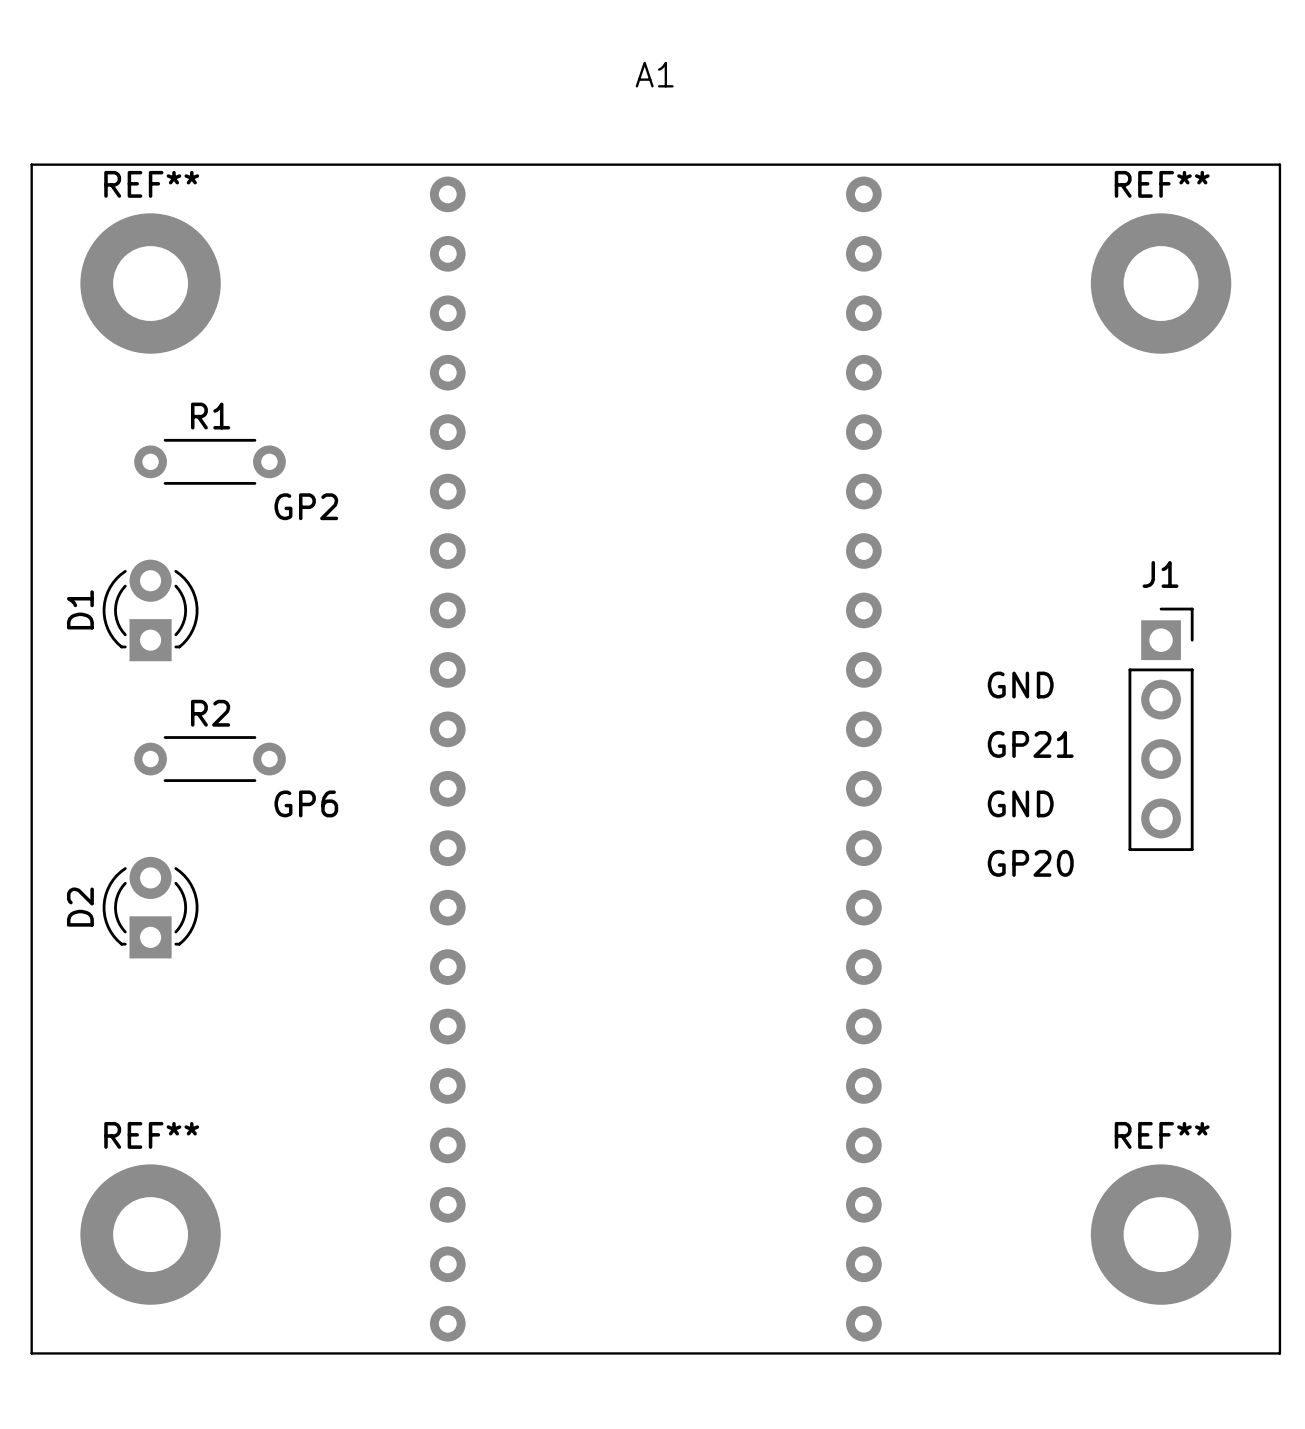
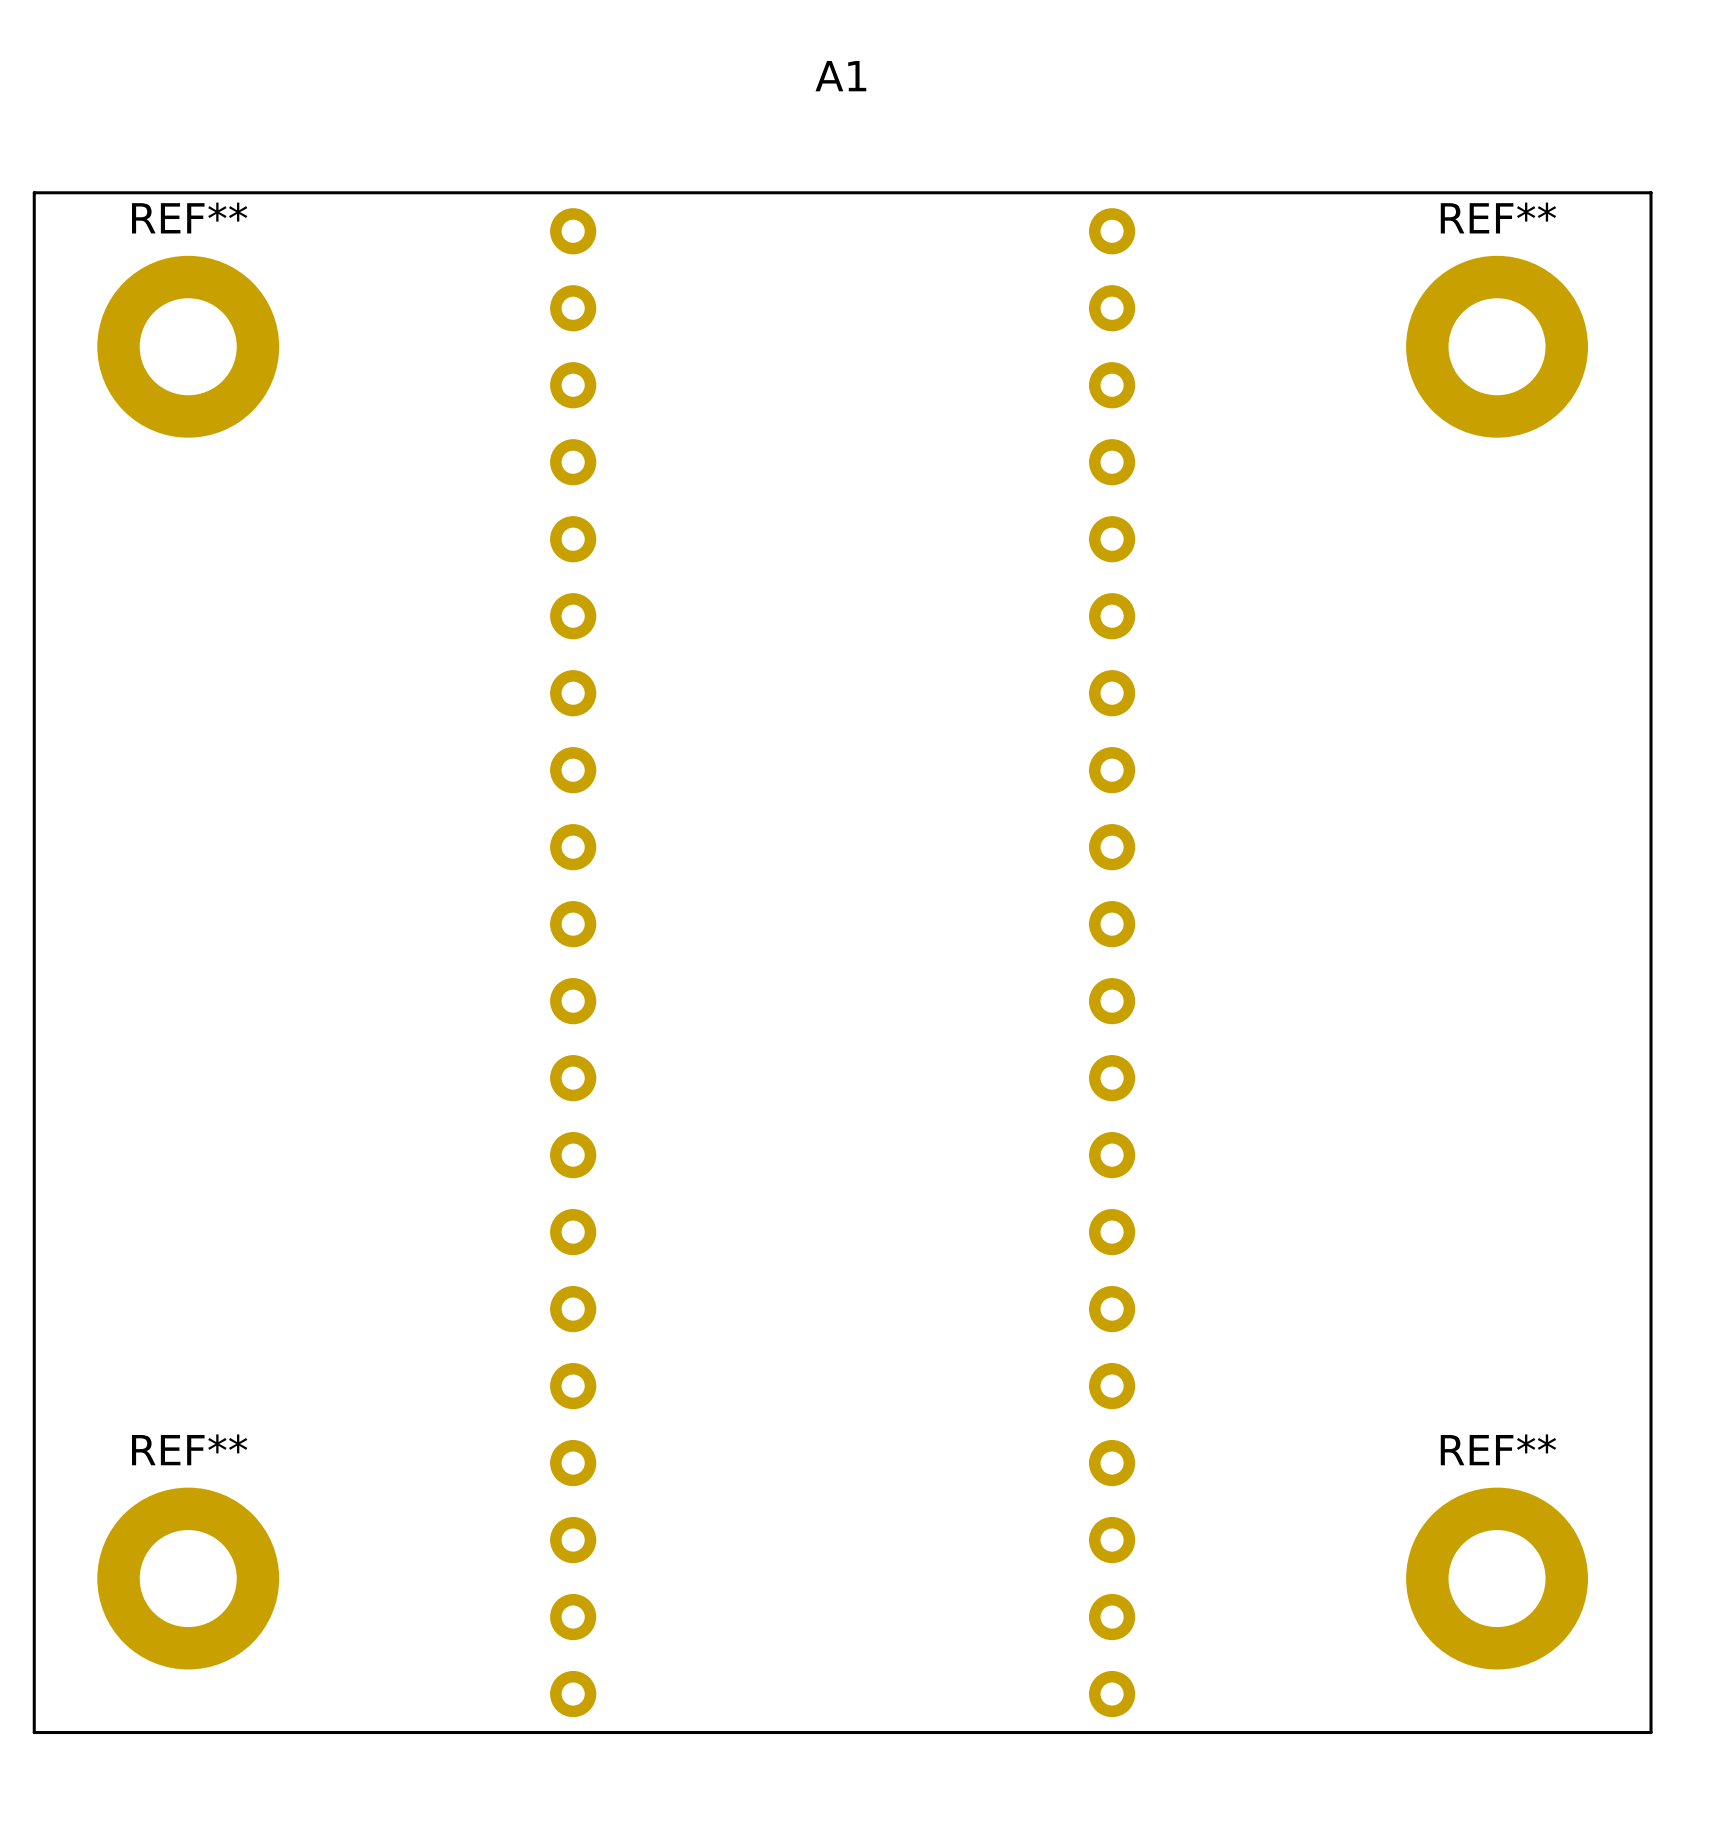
R1: (210, 461) -> none
text: GP2 (306, 506) -> none
D1: (150, 610) -> none
text: GND (1020, 685) -> none
J1: (1161, 729) -> none
text: GP21 (1030, 744) -> none
R2: (210, 759) -> none
text: GP6 (306, 803) -> none
text: GND (1020, 803) -> none
text: GP20 (1030, 863) -> none
D2: (150, 907) -> none

